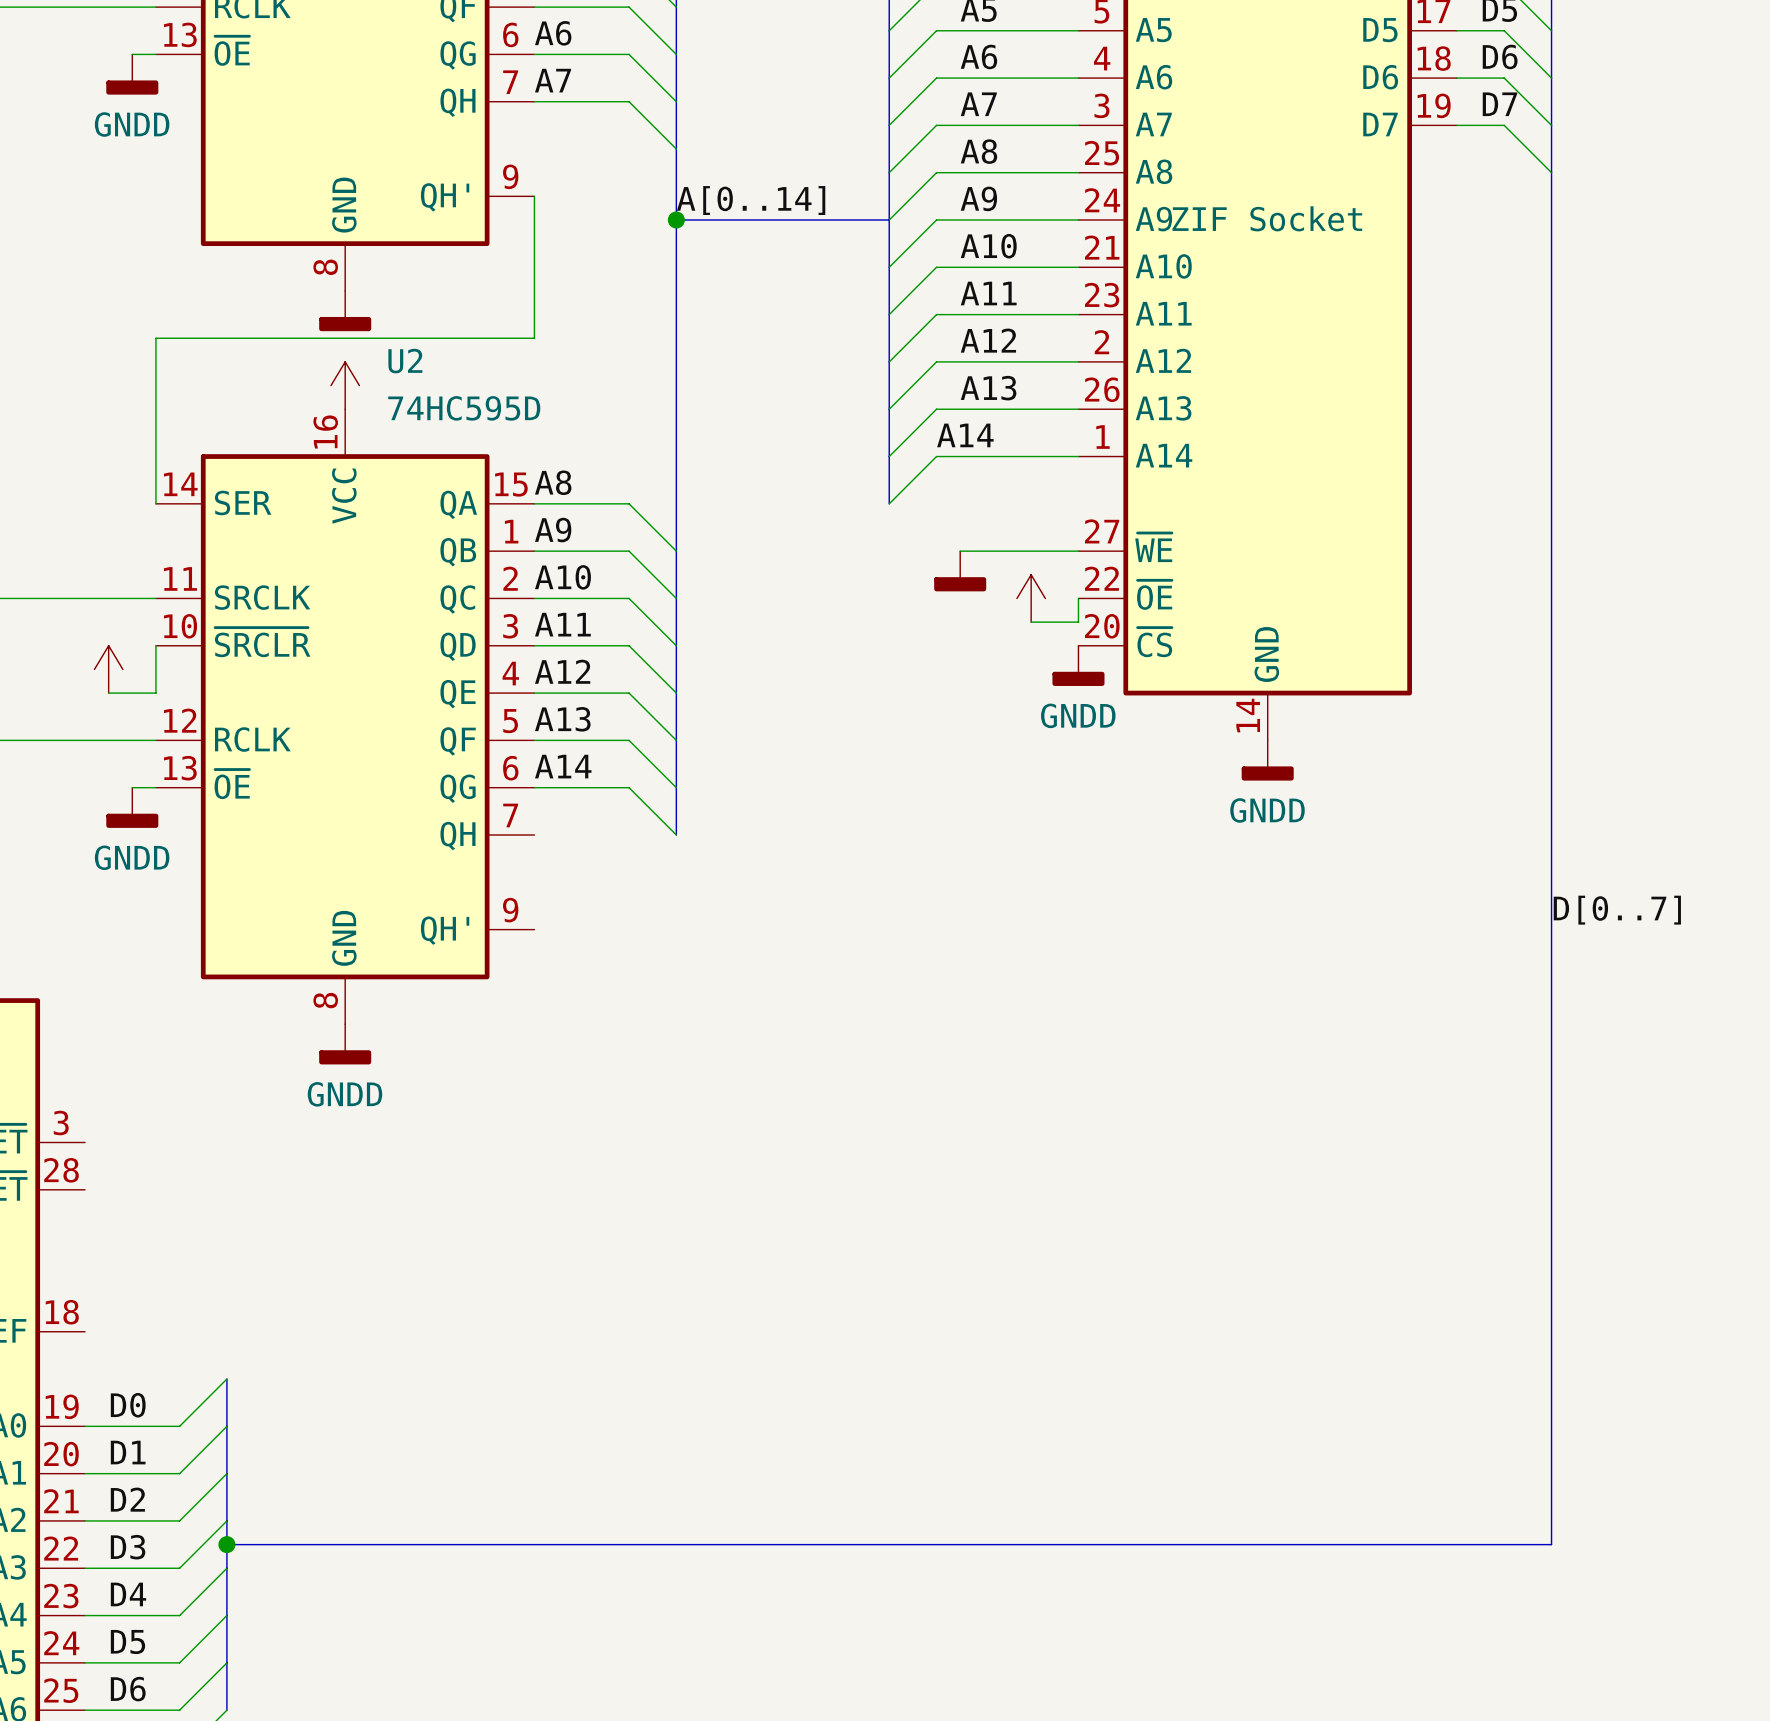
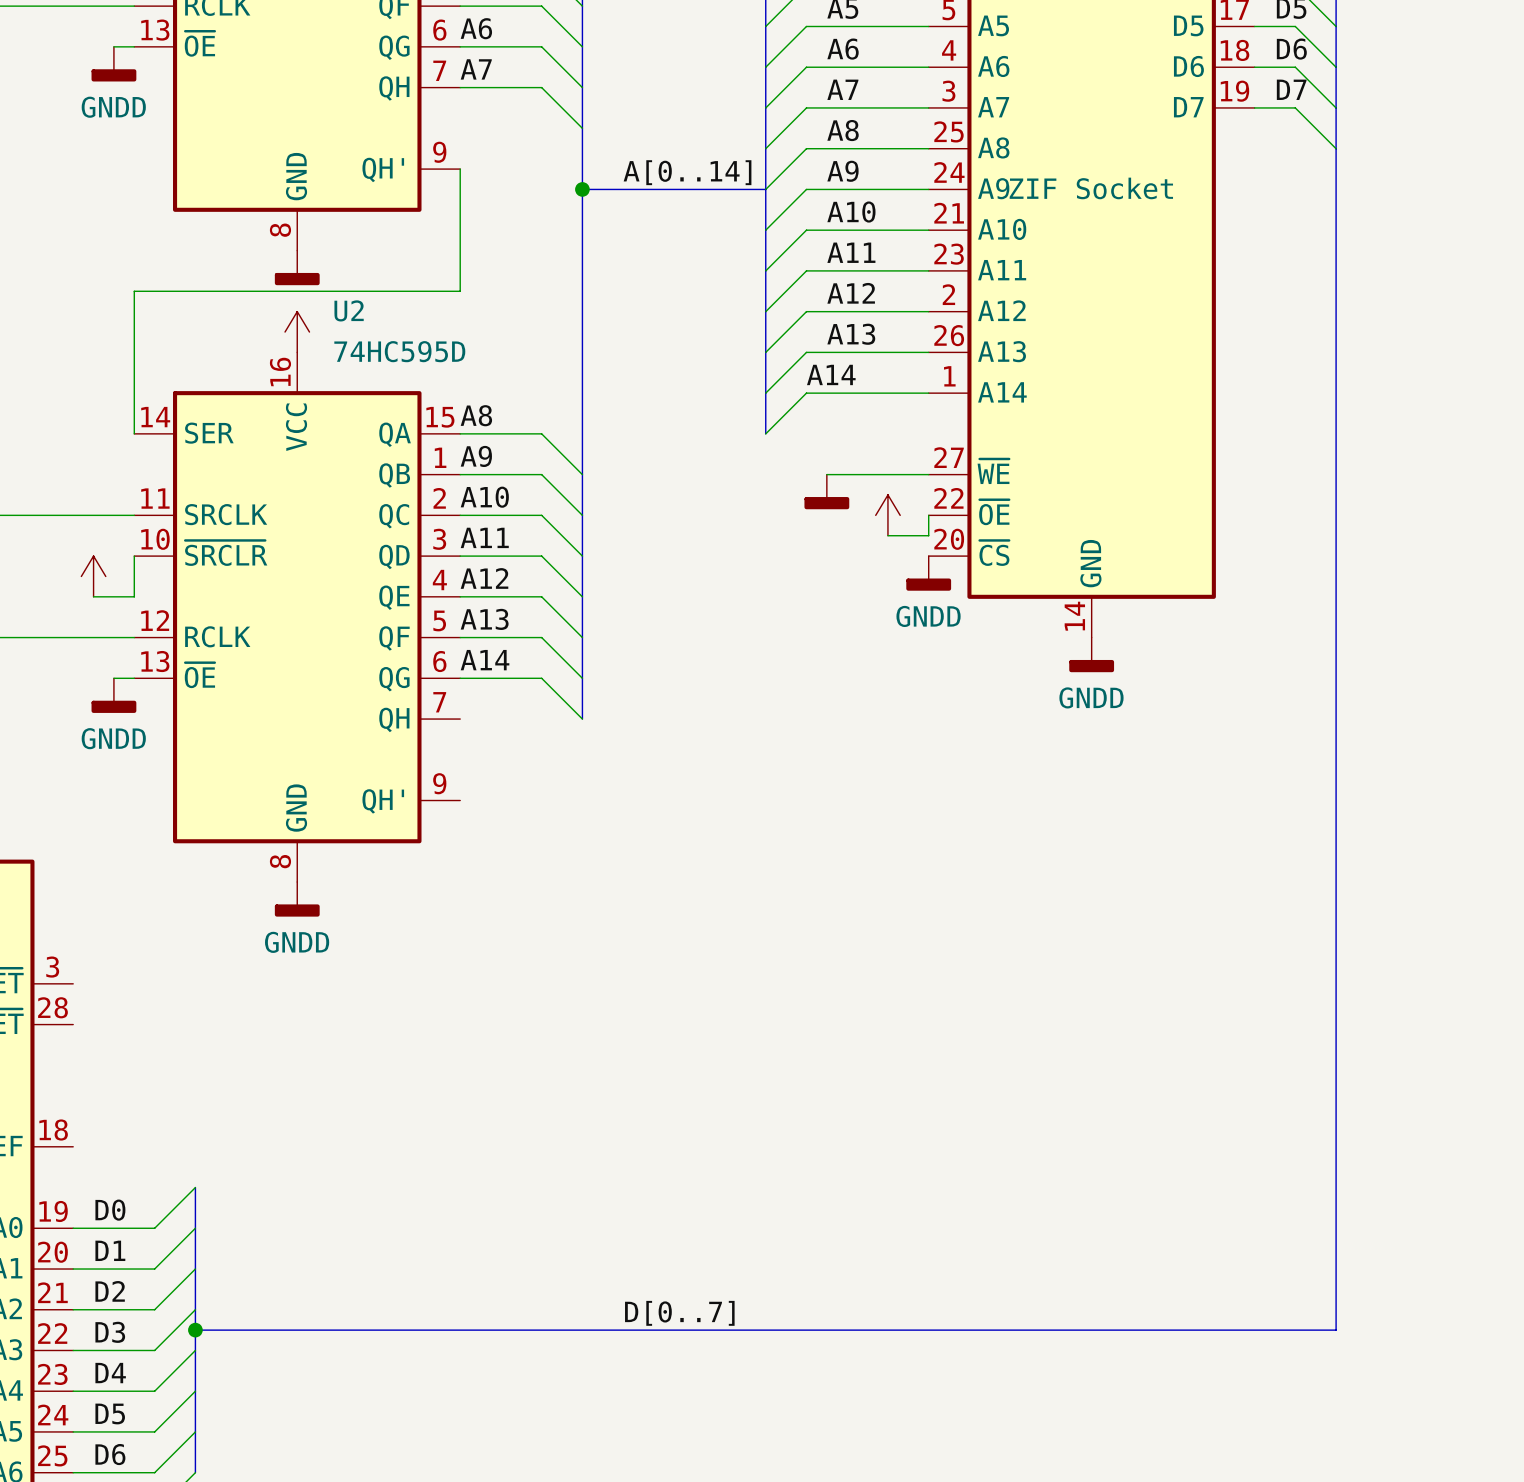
label position: A[0..14] (751, 200) -> A[0..14] (687, 172)
label: D[0..7] (1617, 910) -> none
label: none -> D[0..7] (679, 1313)

